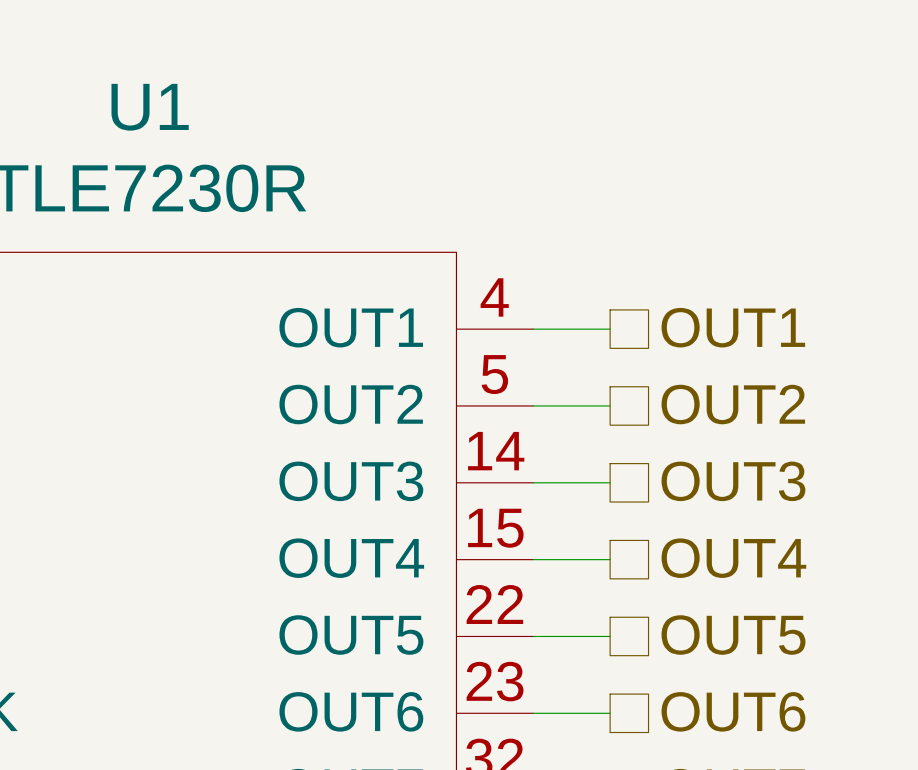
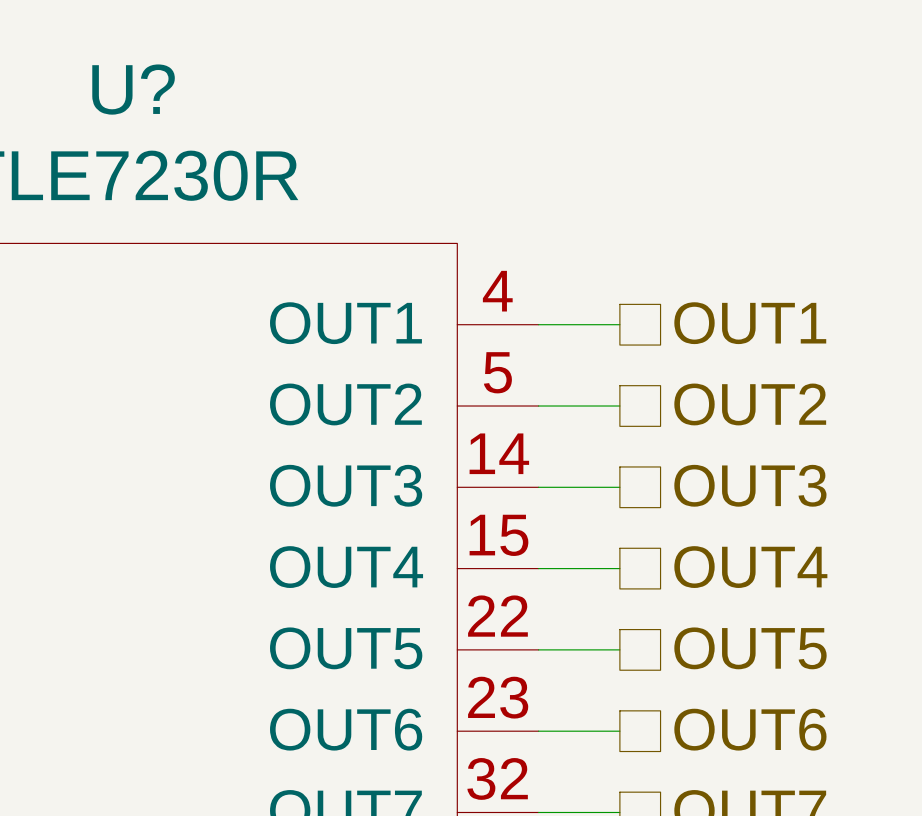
U1 name: U1 (150, 107) -> U? (133, 89)

